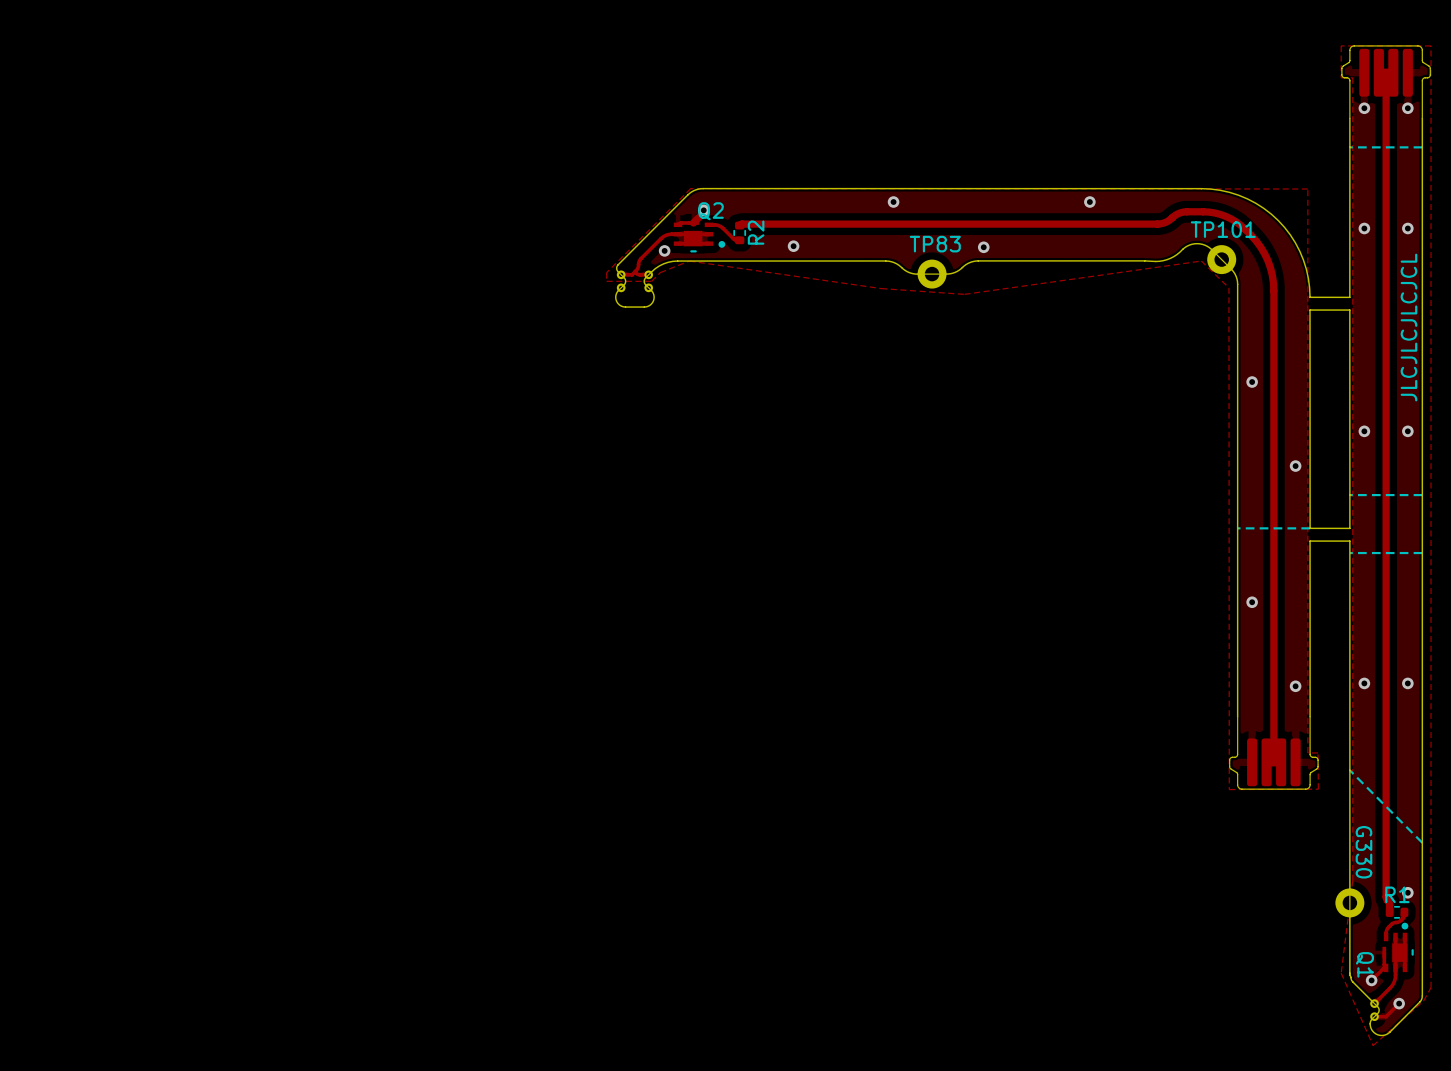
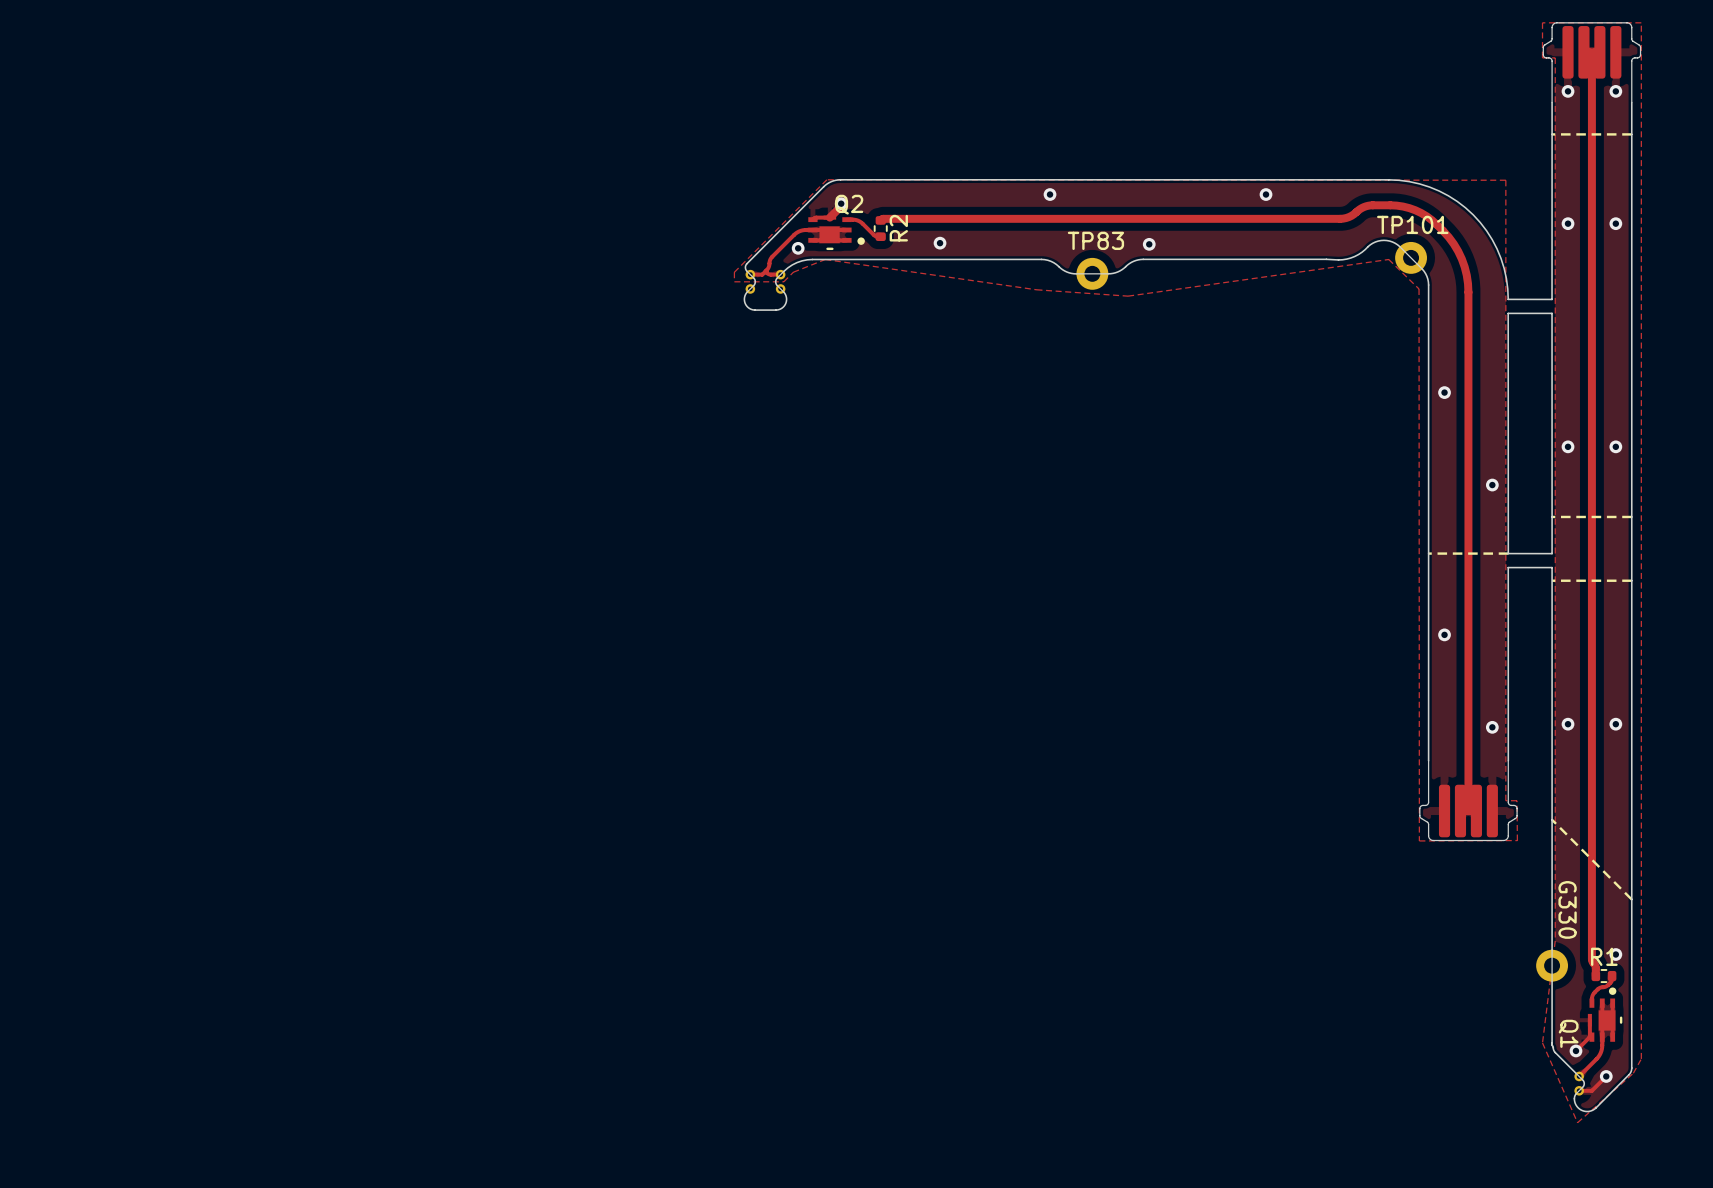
text: JLCJLCJLCJCL (1408, 327) -> none

